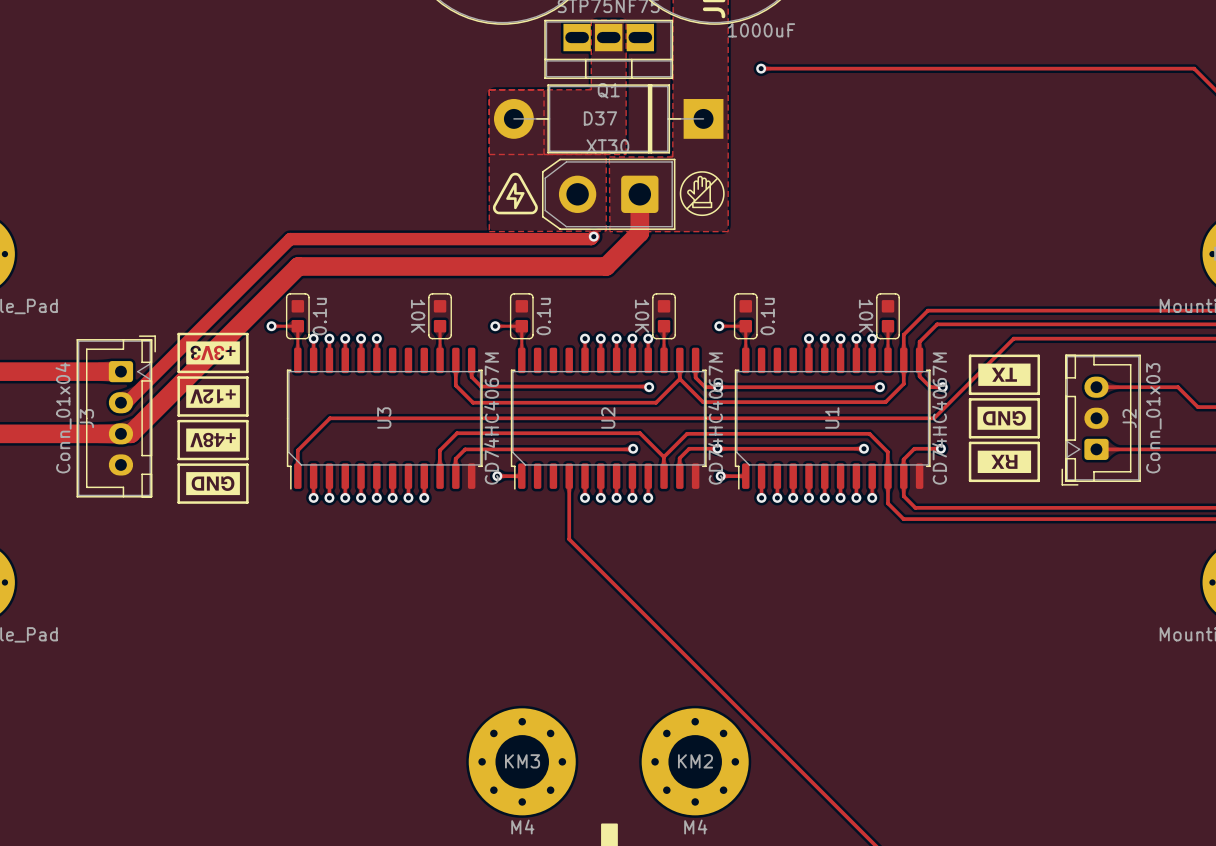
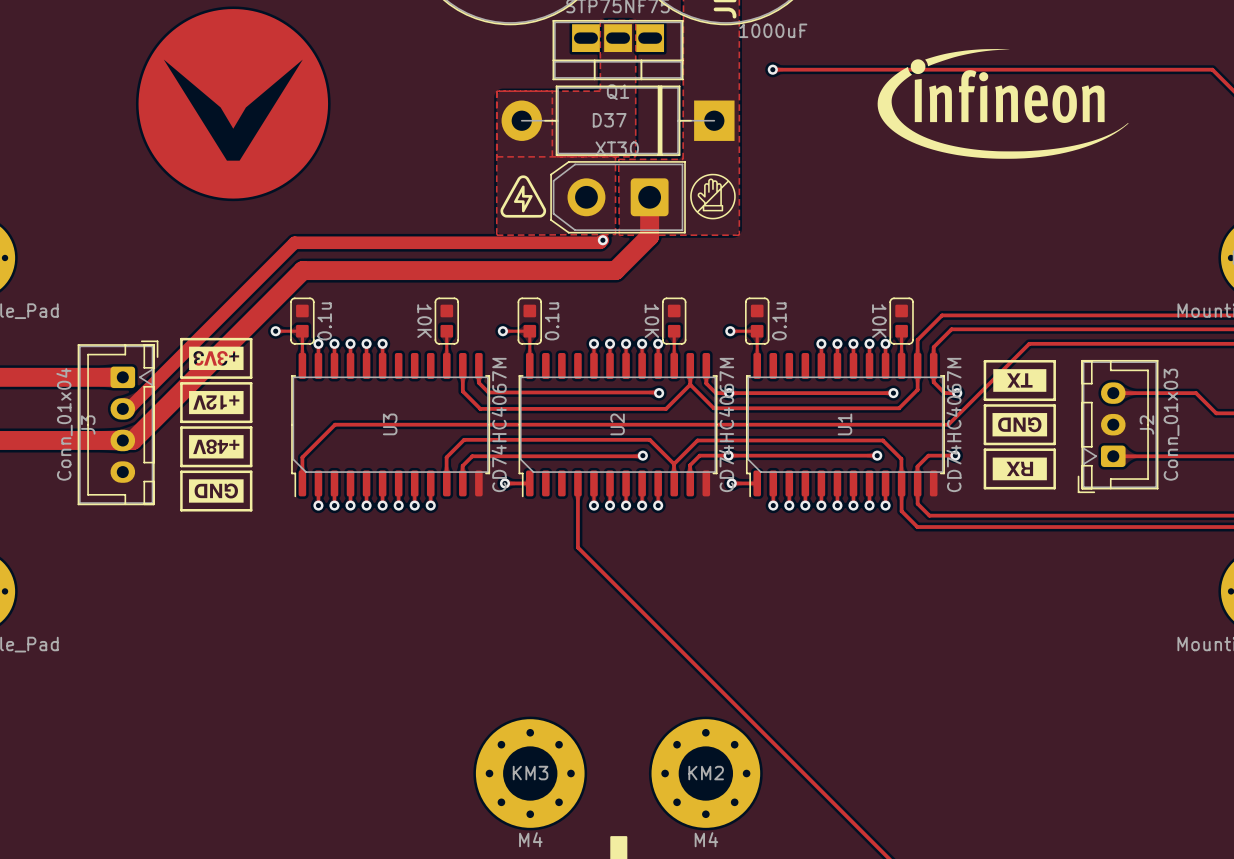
drawing: none -> [877, 49, 1129, 159]
part: none -> (233, 103)

